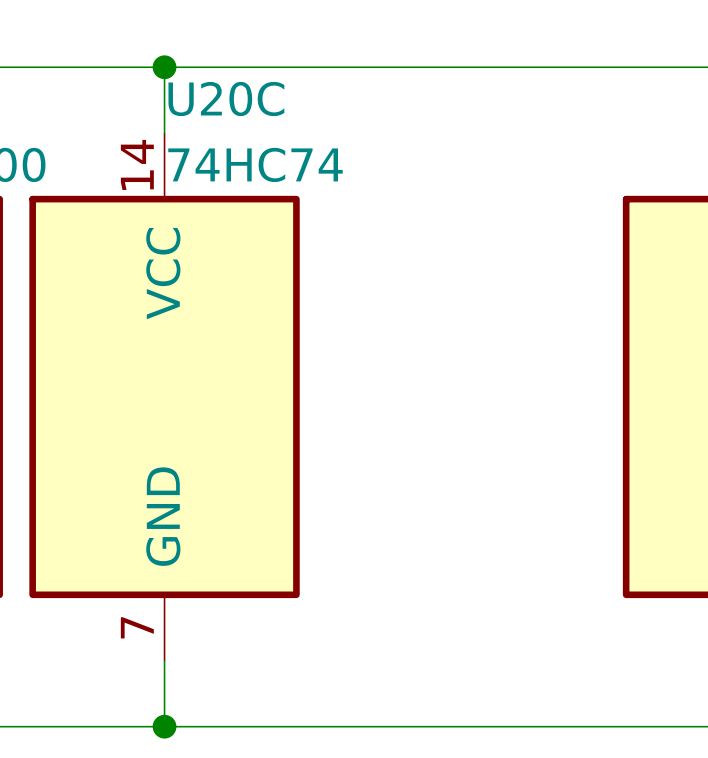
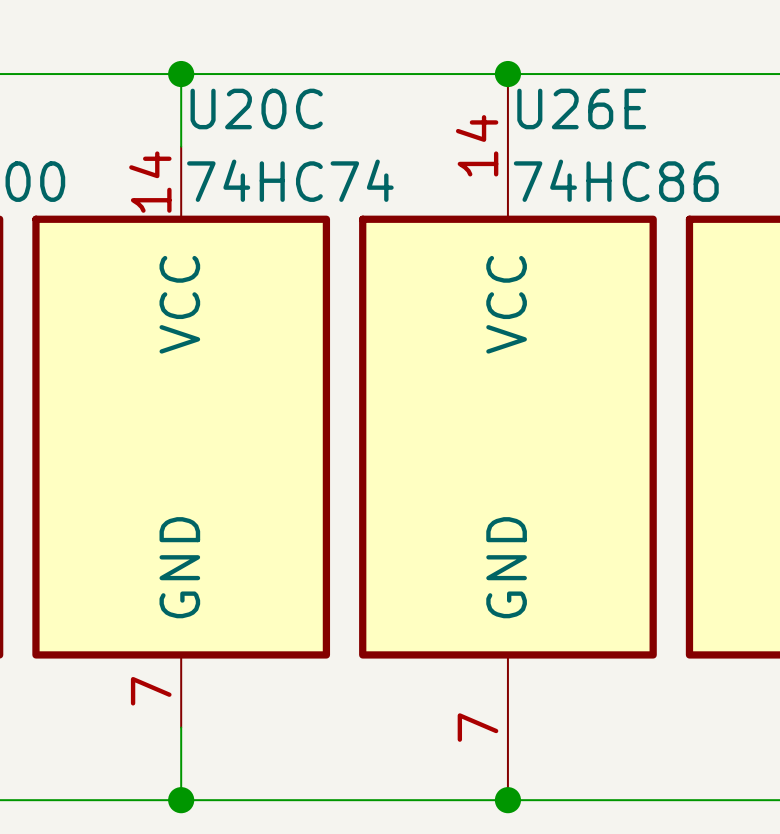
junction: none -> (507, 74)
U26E: none -> 74HC86 (507, 437)
junction: none -> (507, 800)

